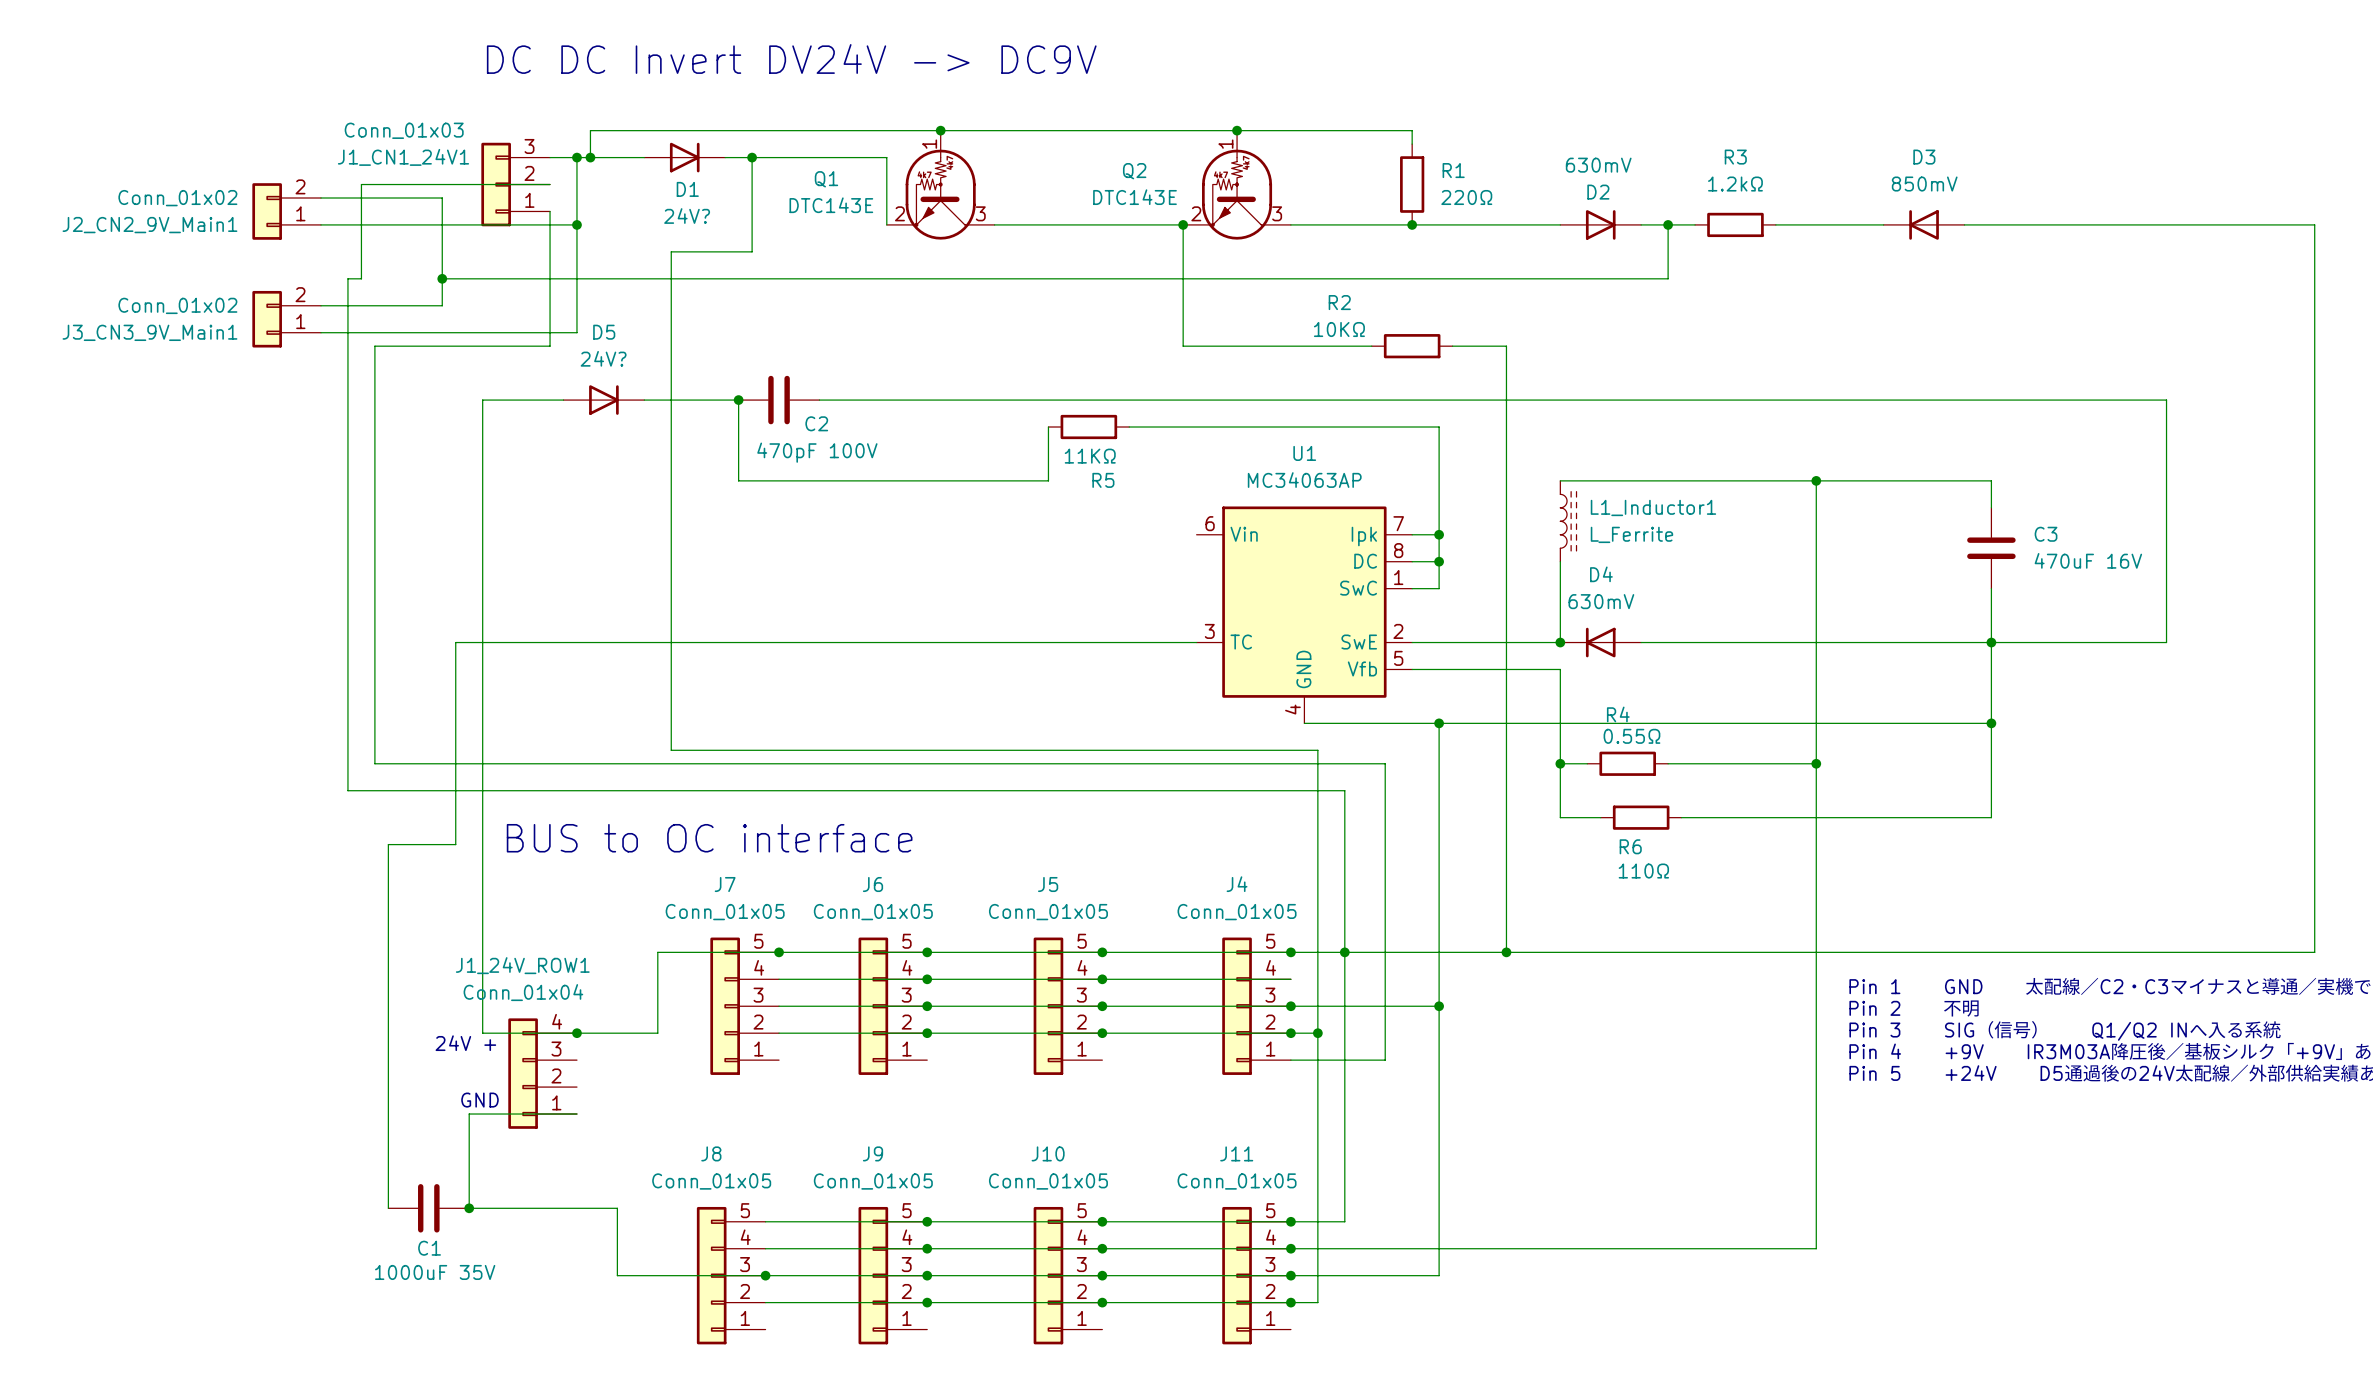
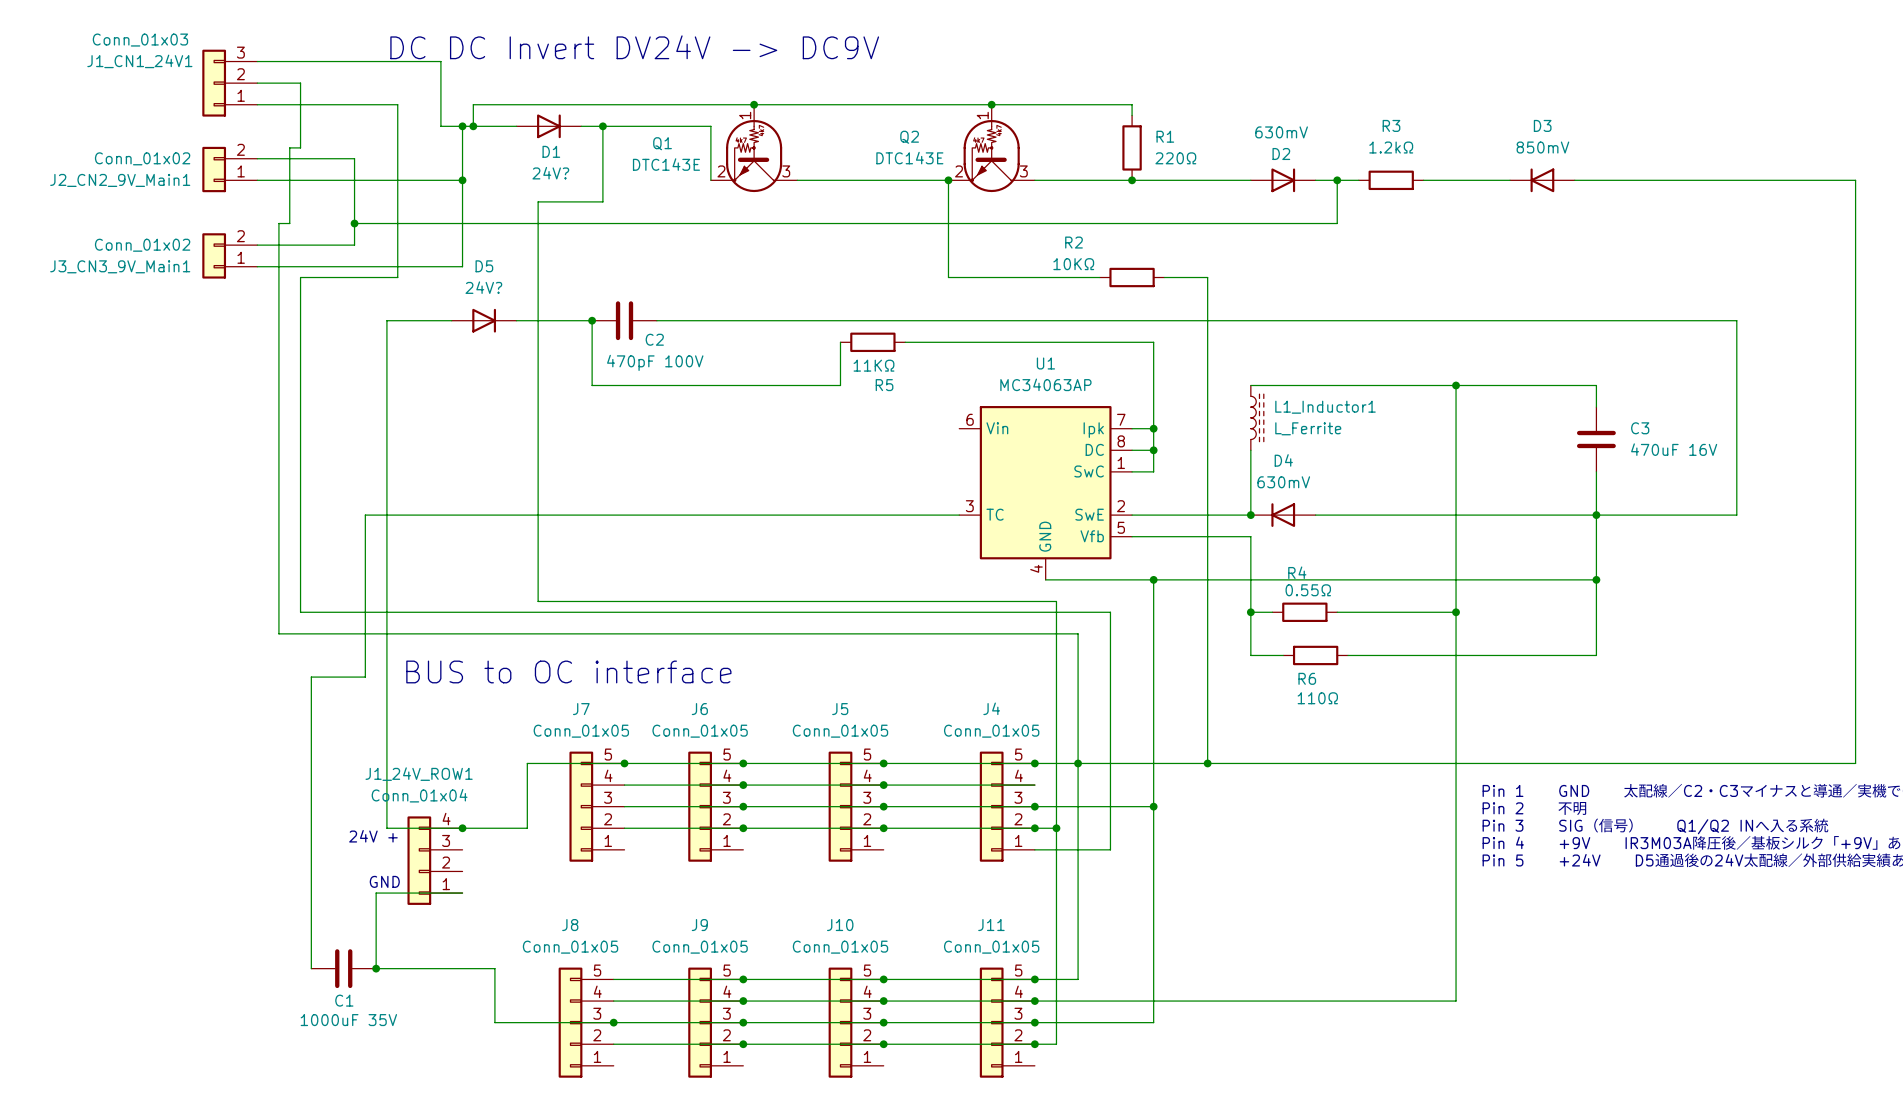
wire: none -> (257, 61) (440, 61) (440, 126)
wire: (374, 184) (550, 184) -> (300, 147) (300, 83) (257, 83)
J1_CN1_24V1 position: (515, 184) -> (229, 83)
wire: (550, 211) (550, 346) (496, 346) -> (257, 104) (397, 104) (397, 277)

